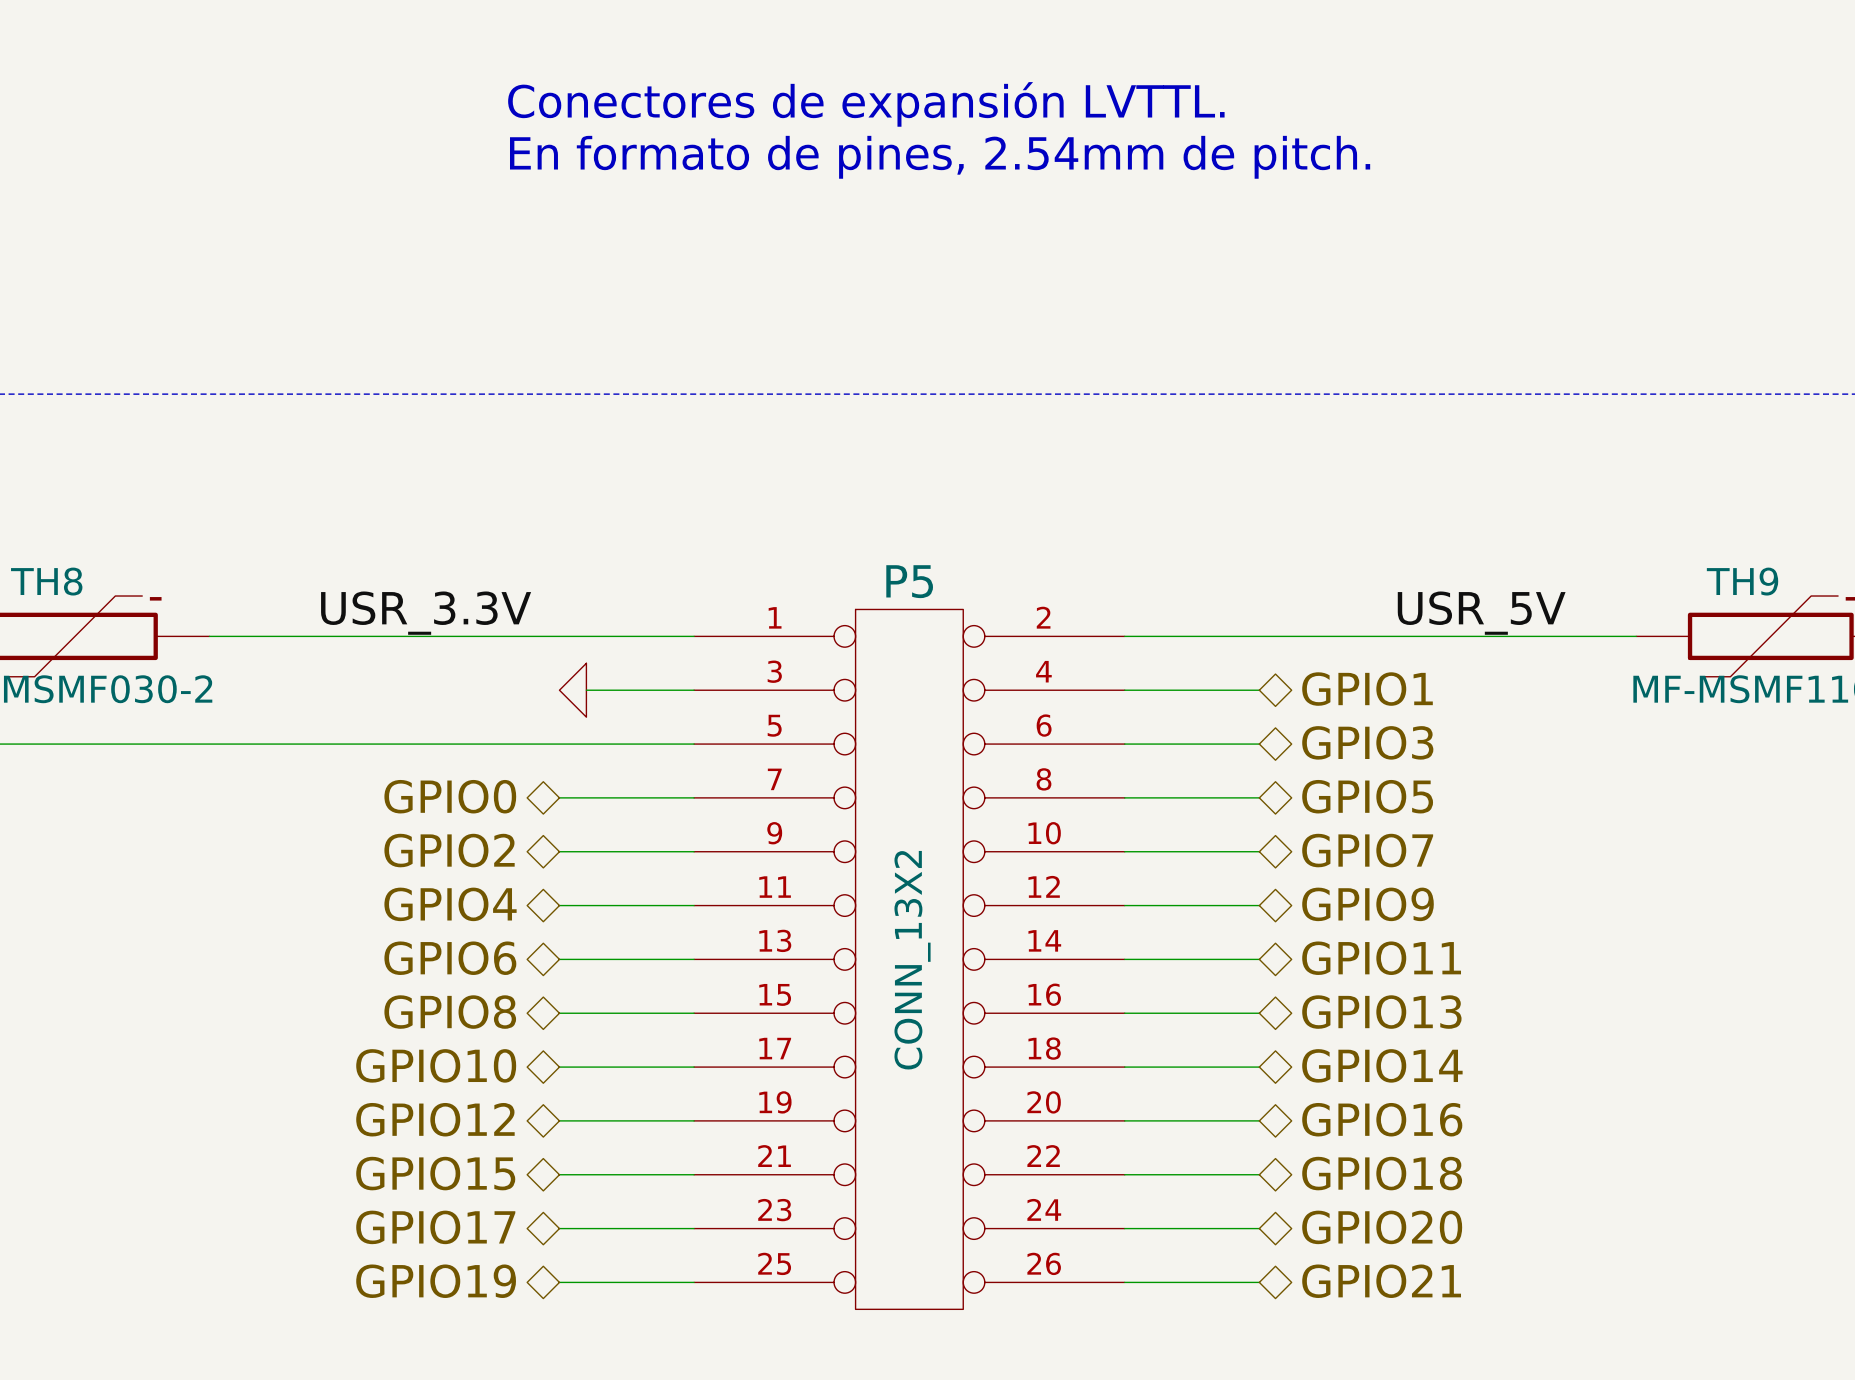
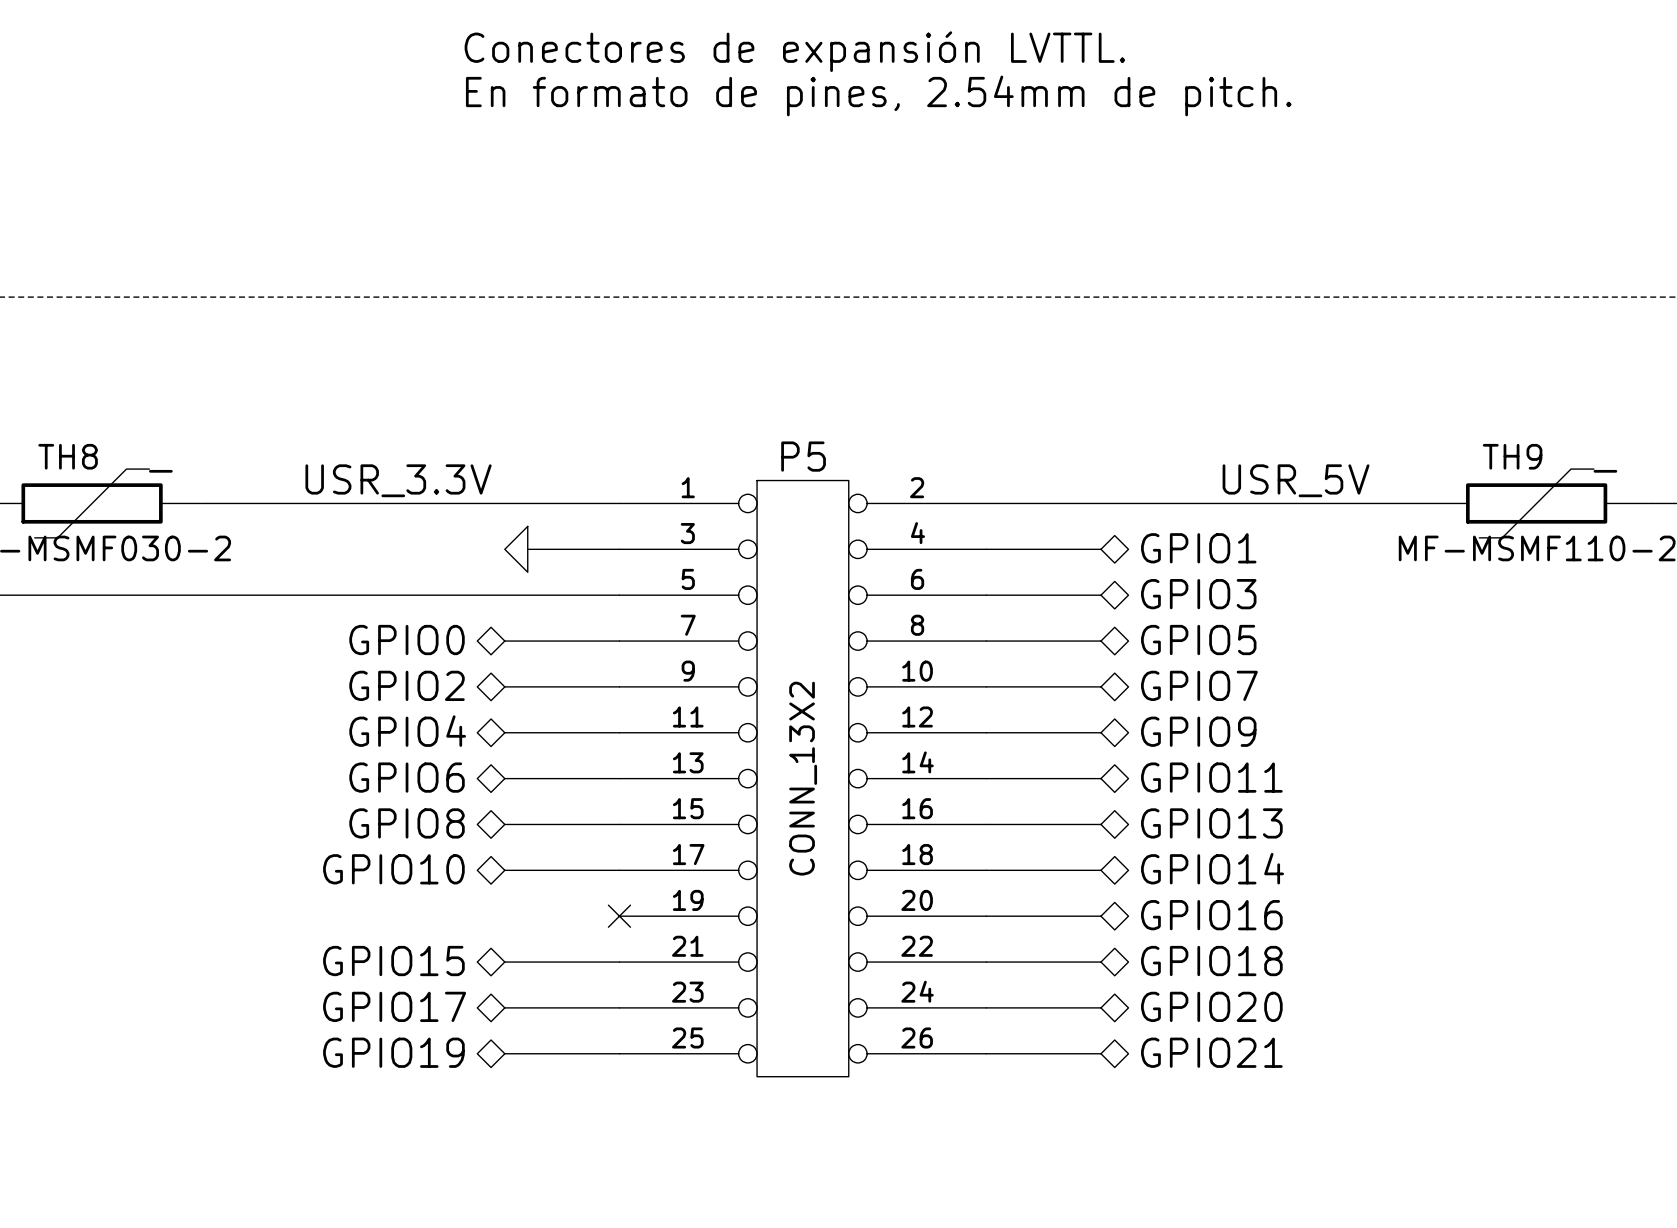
hierarchical label: GPIO12 (435, 1119) -> none
wire: (559, 1120) (694, 1120) -> none
no-connect mark: none -> (619, 916)

